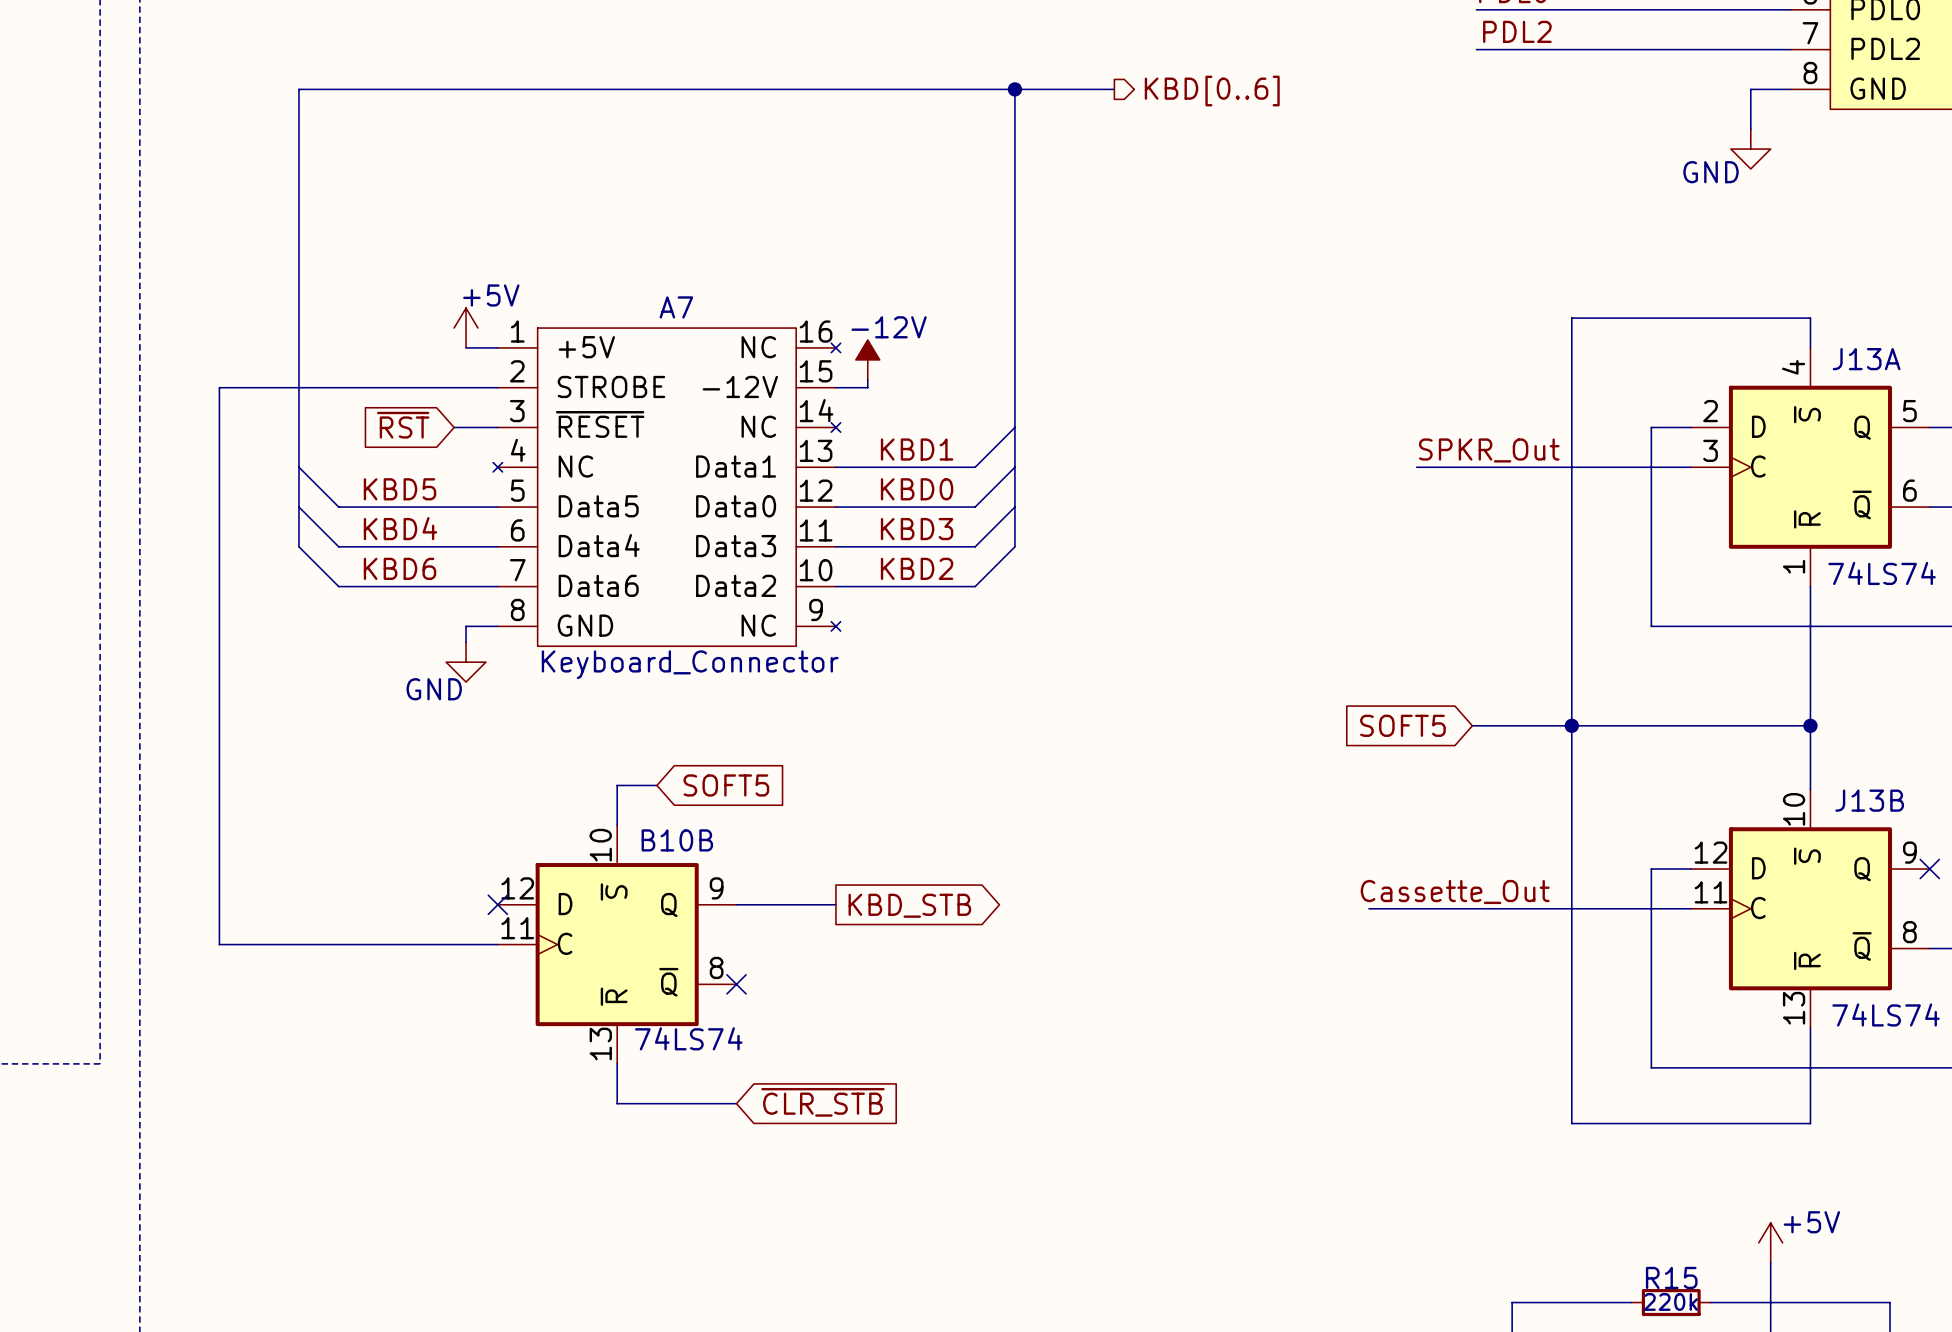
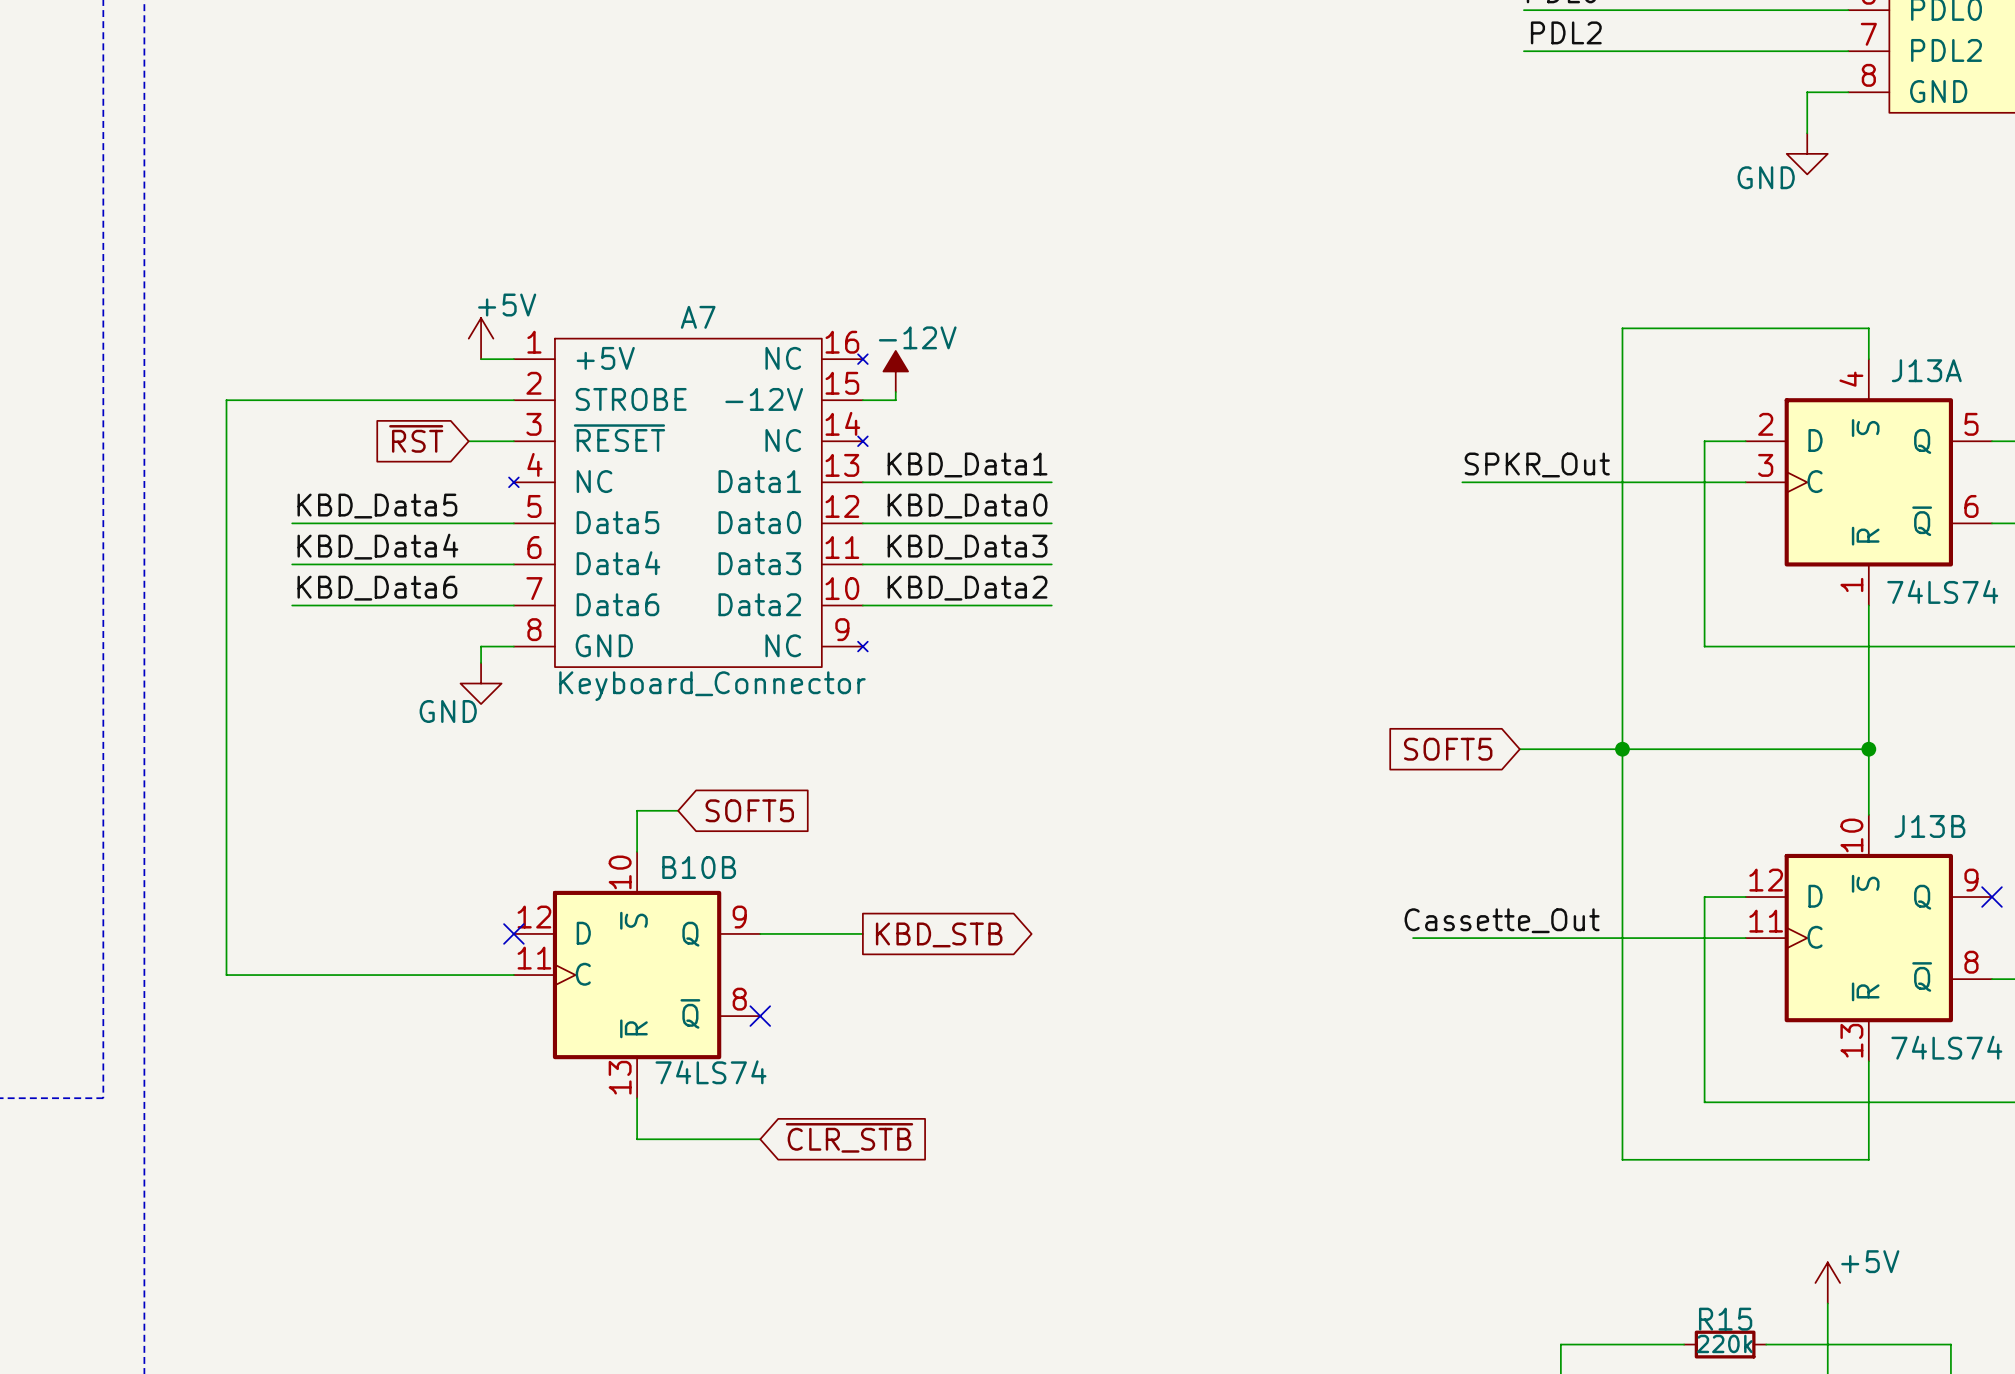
bus: (1014, 89) (1014, 546) -> none
junction: (1014, 89) -> none
bus: (1114, 89) (298, 89) (298, 546) -> none
hierarchical label: KBD[0..6] (1212, 91) -> none
wire: (1014, 427) (975, 467) -> (1051, 482) (1006, 482)
label: KBD1 (917, 449) -> KBD_Data1 (967, 464)
wire: (298, 467) (338, 507) -> (292, 523) (349, 523)
wire: (1014, 467) (975, 507) -> (1051, 523) (1006, 523)
label: KBD5 (399, 489) -> KBD_Data5 (377, 506)
label: KBD0 (917, 489) -> KBD_Data0 (967, 506)
wire: (298, 507) (338, 546) -> (292, 564) (349, 564)
wire: (1014, 507) (975, 546) -> (1051, 564) (1006, 564)
label: KBD4 (400, 528) -> KBD_Data4 (377, 546)
label: KBD3 (917, 529) -> KBD_Data3 (967, 547)
wire: (298, 546) (338, 586) -> (292, 605) (349, 605)
wire: (1014, 546) (975, 586) -> (1051, 605) (1006, 605)
label: KBD6 (399, 568) -> KBD_Data6 (377, 588)
label: KBD2 (917, 568) -> KBD_Data2 (967, 588)

